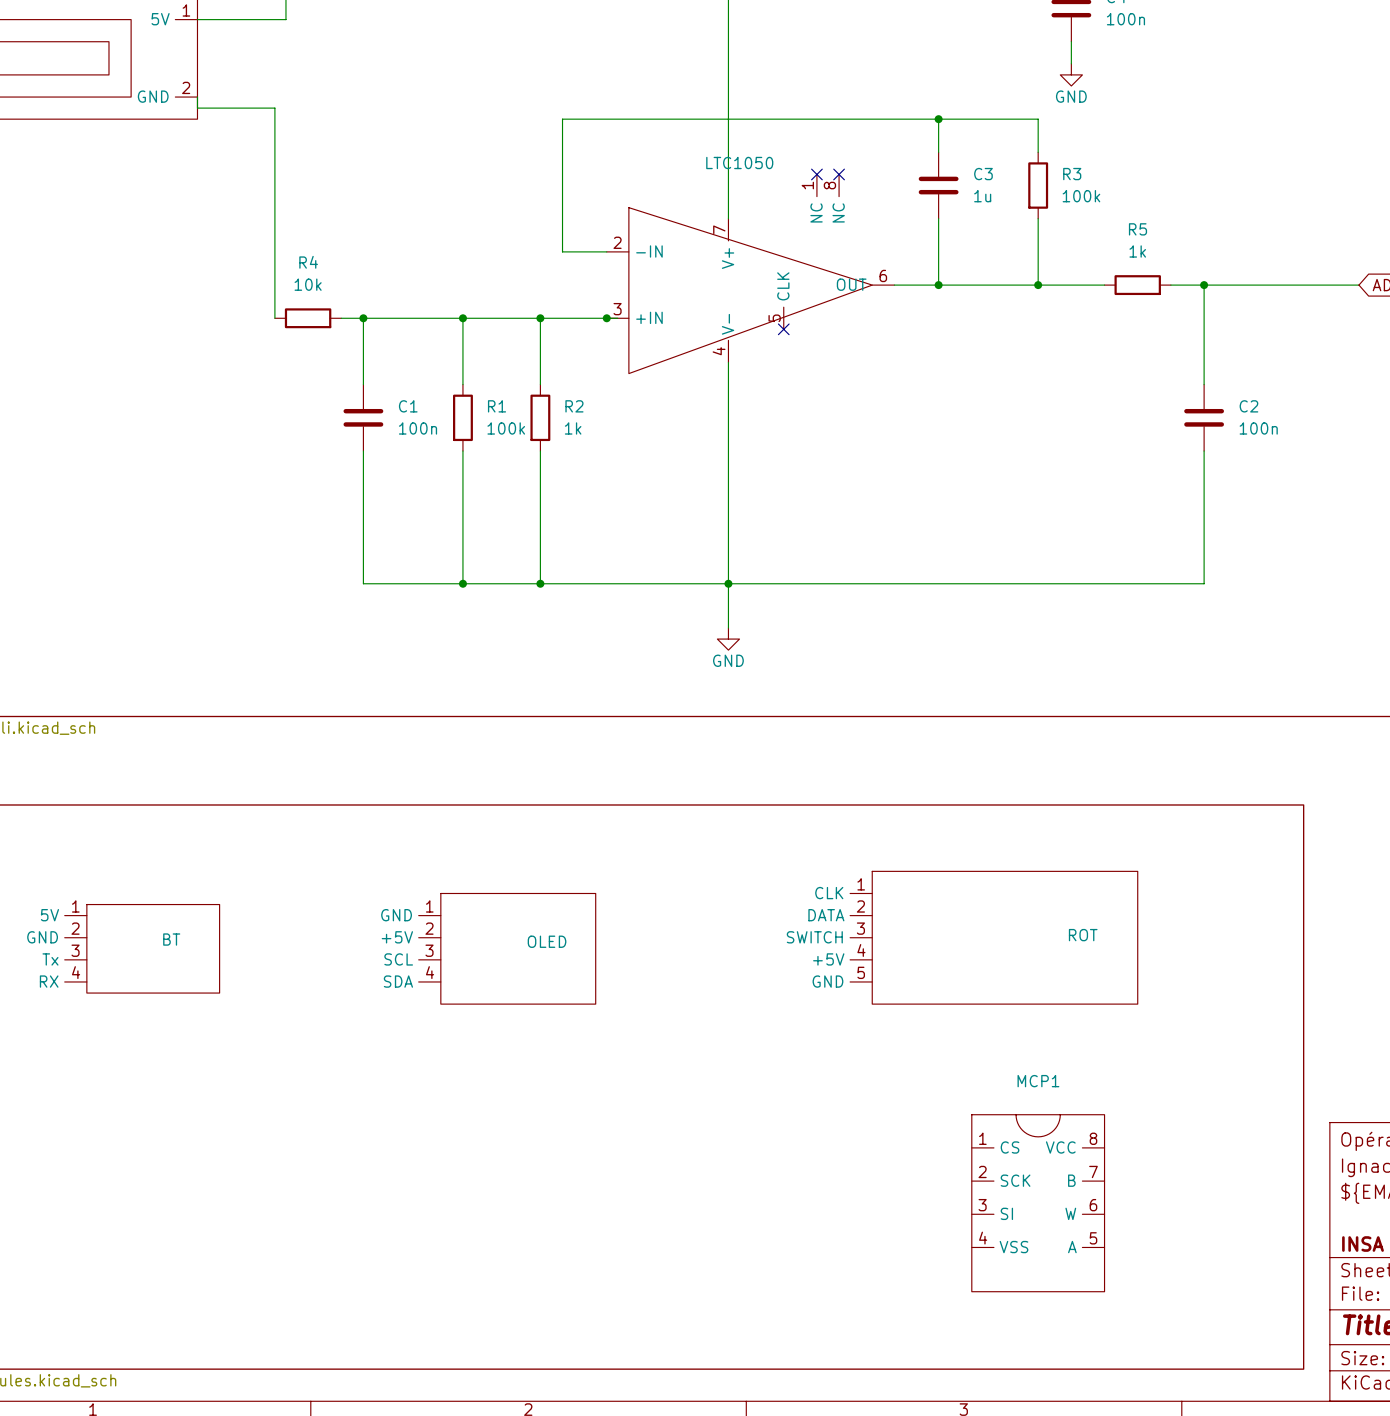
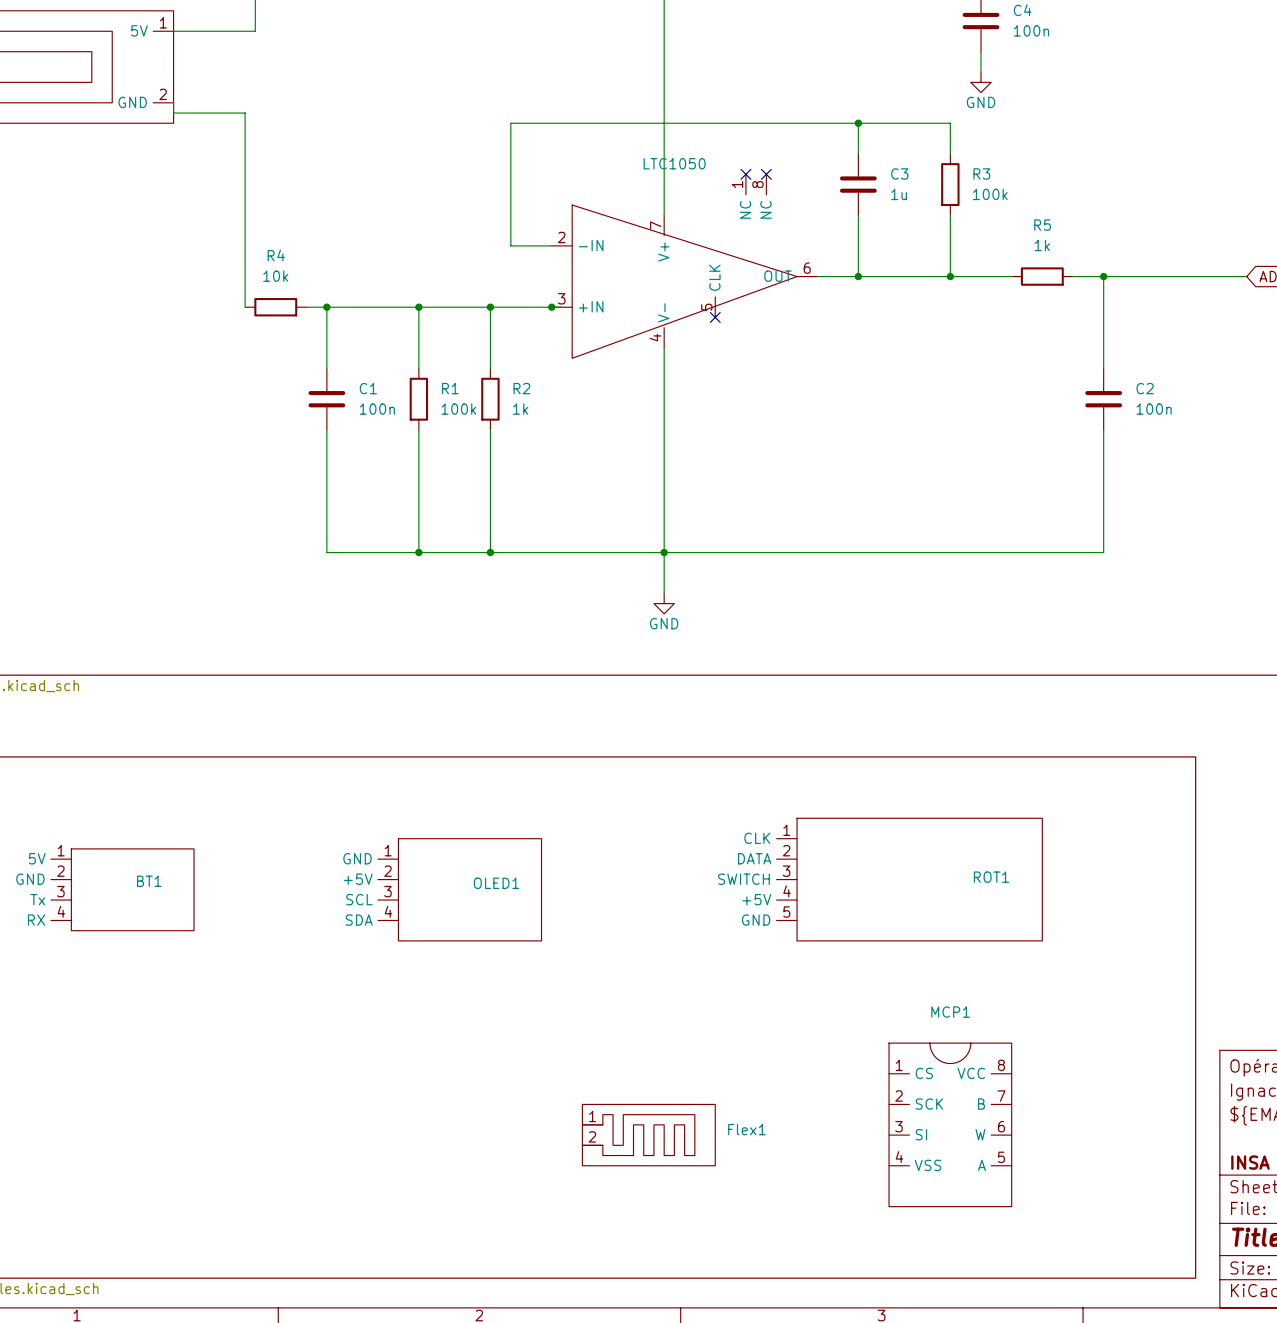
ROT name: ROT (1083, 935) -> ROT1 (991, 877)
BT name: BT (171, 939) -> BT1 (149, 881)
OLED name: OLED (547, 941) -> OLED1 (496, 883)
Flex1: none -> (648, 1135)

